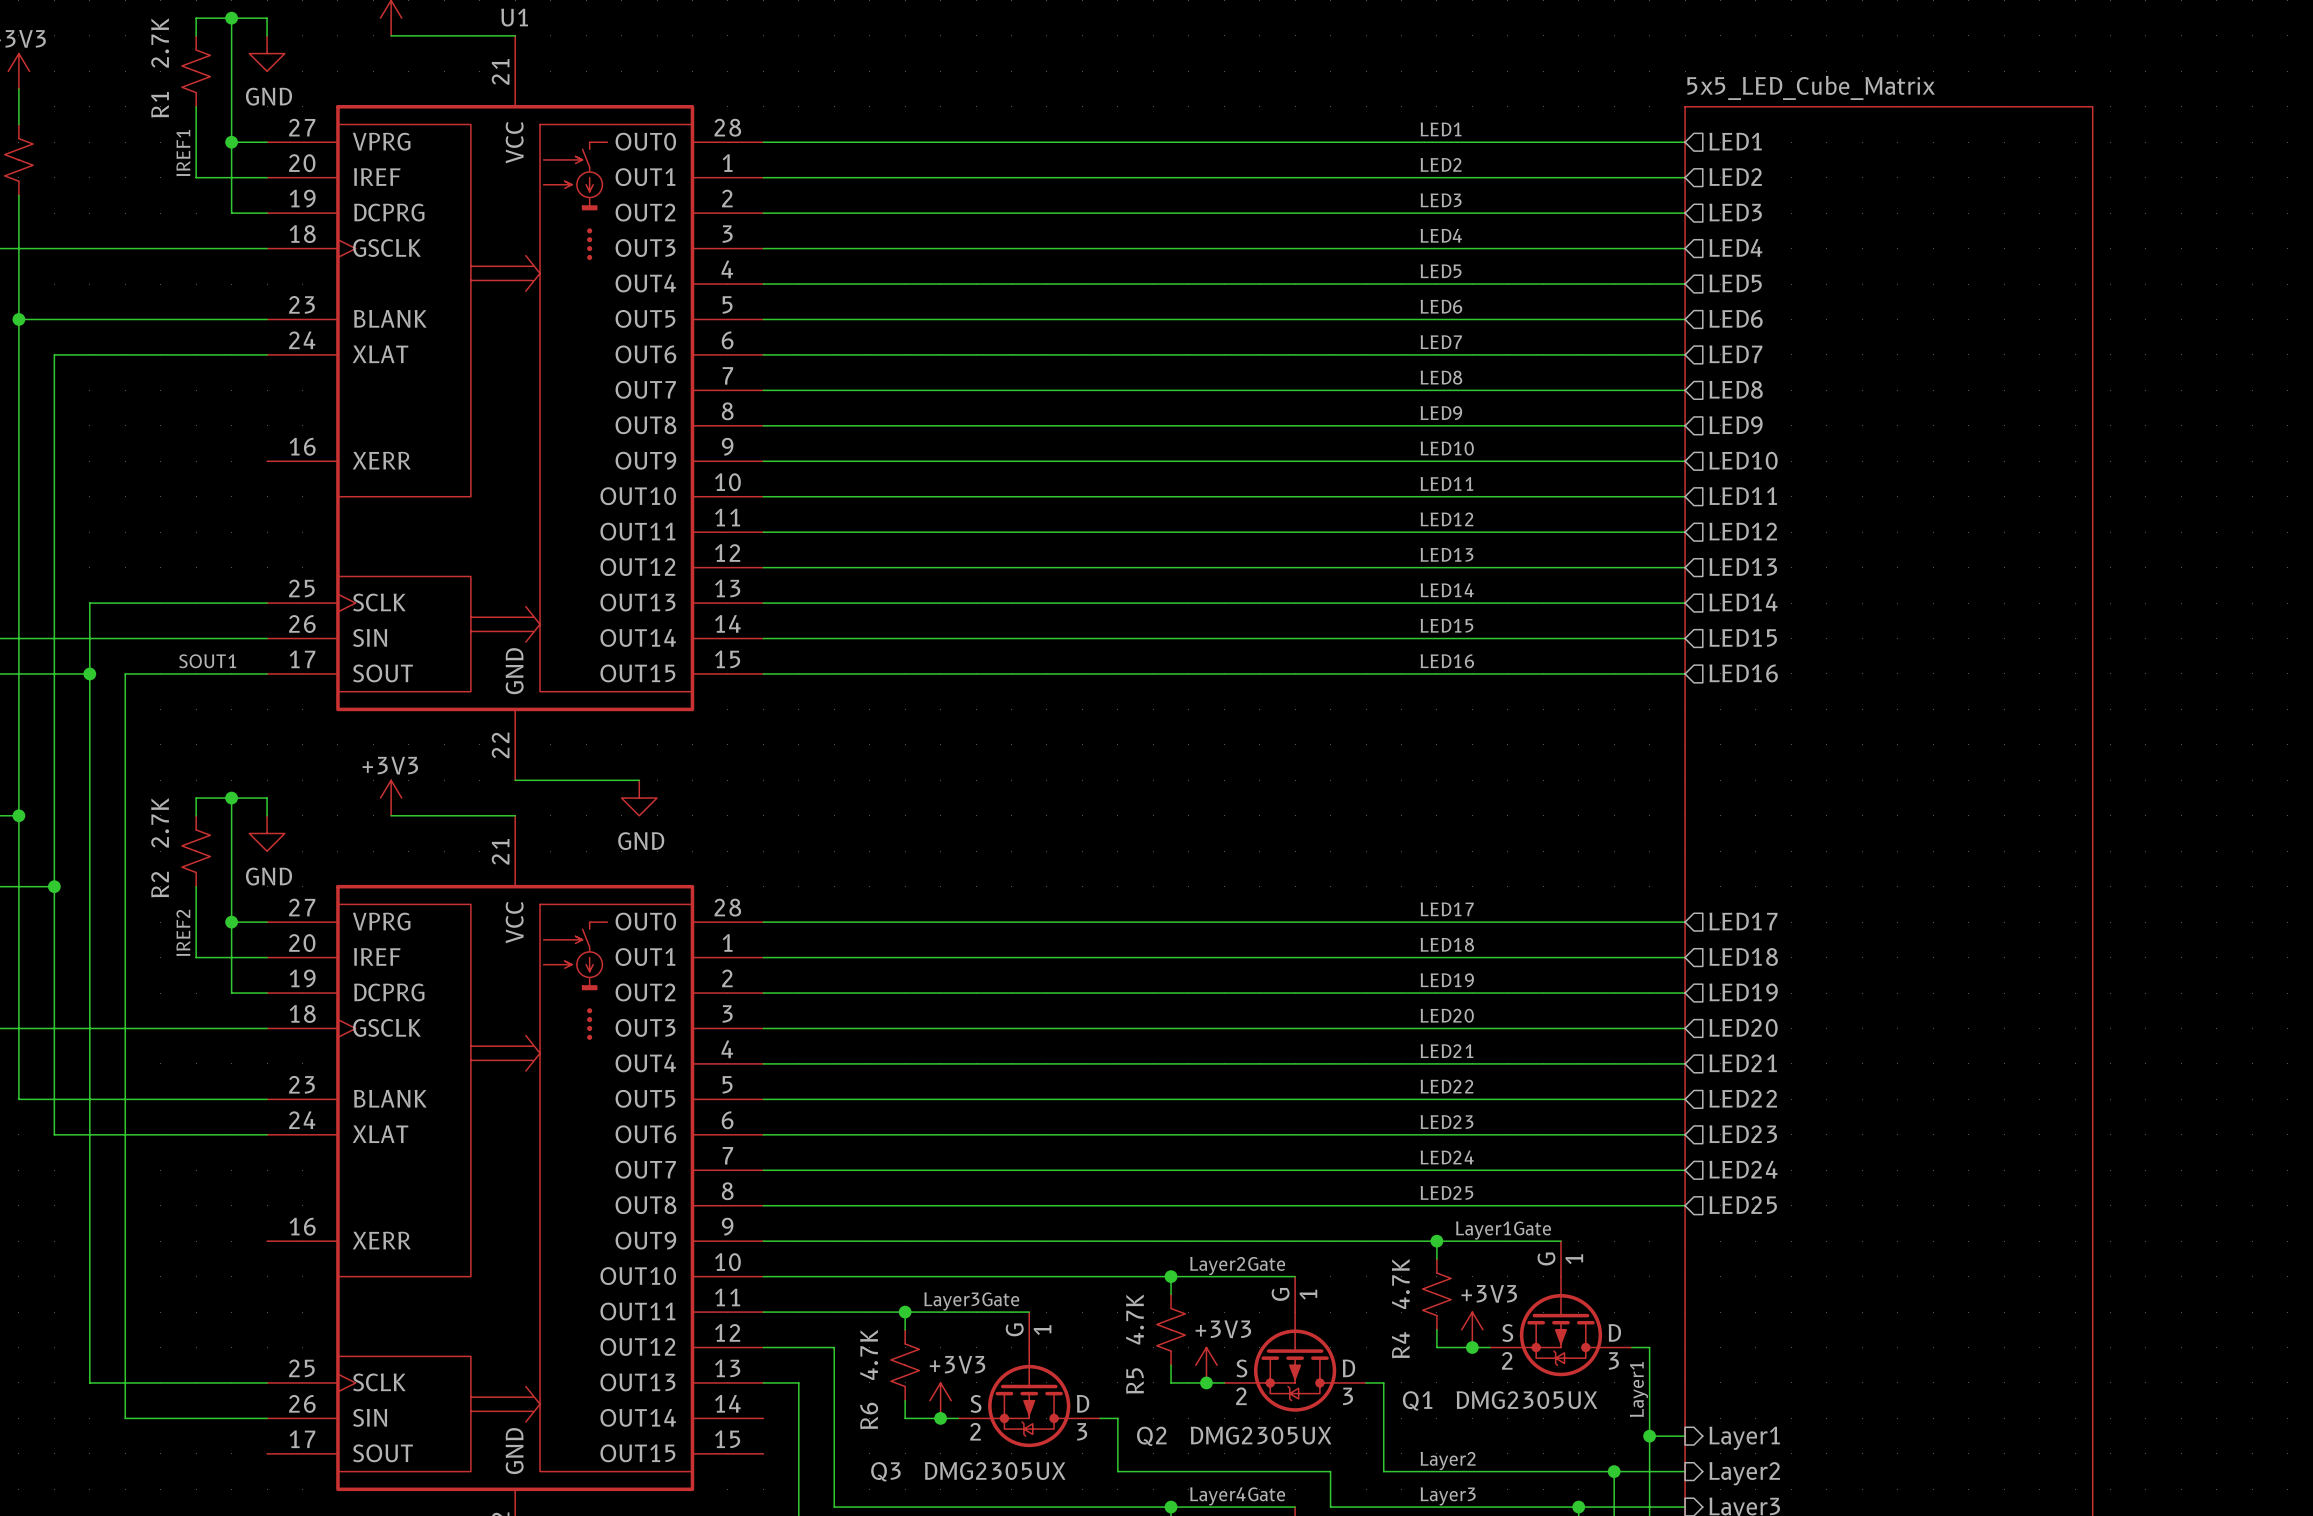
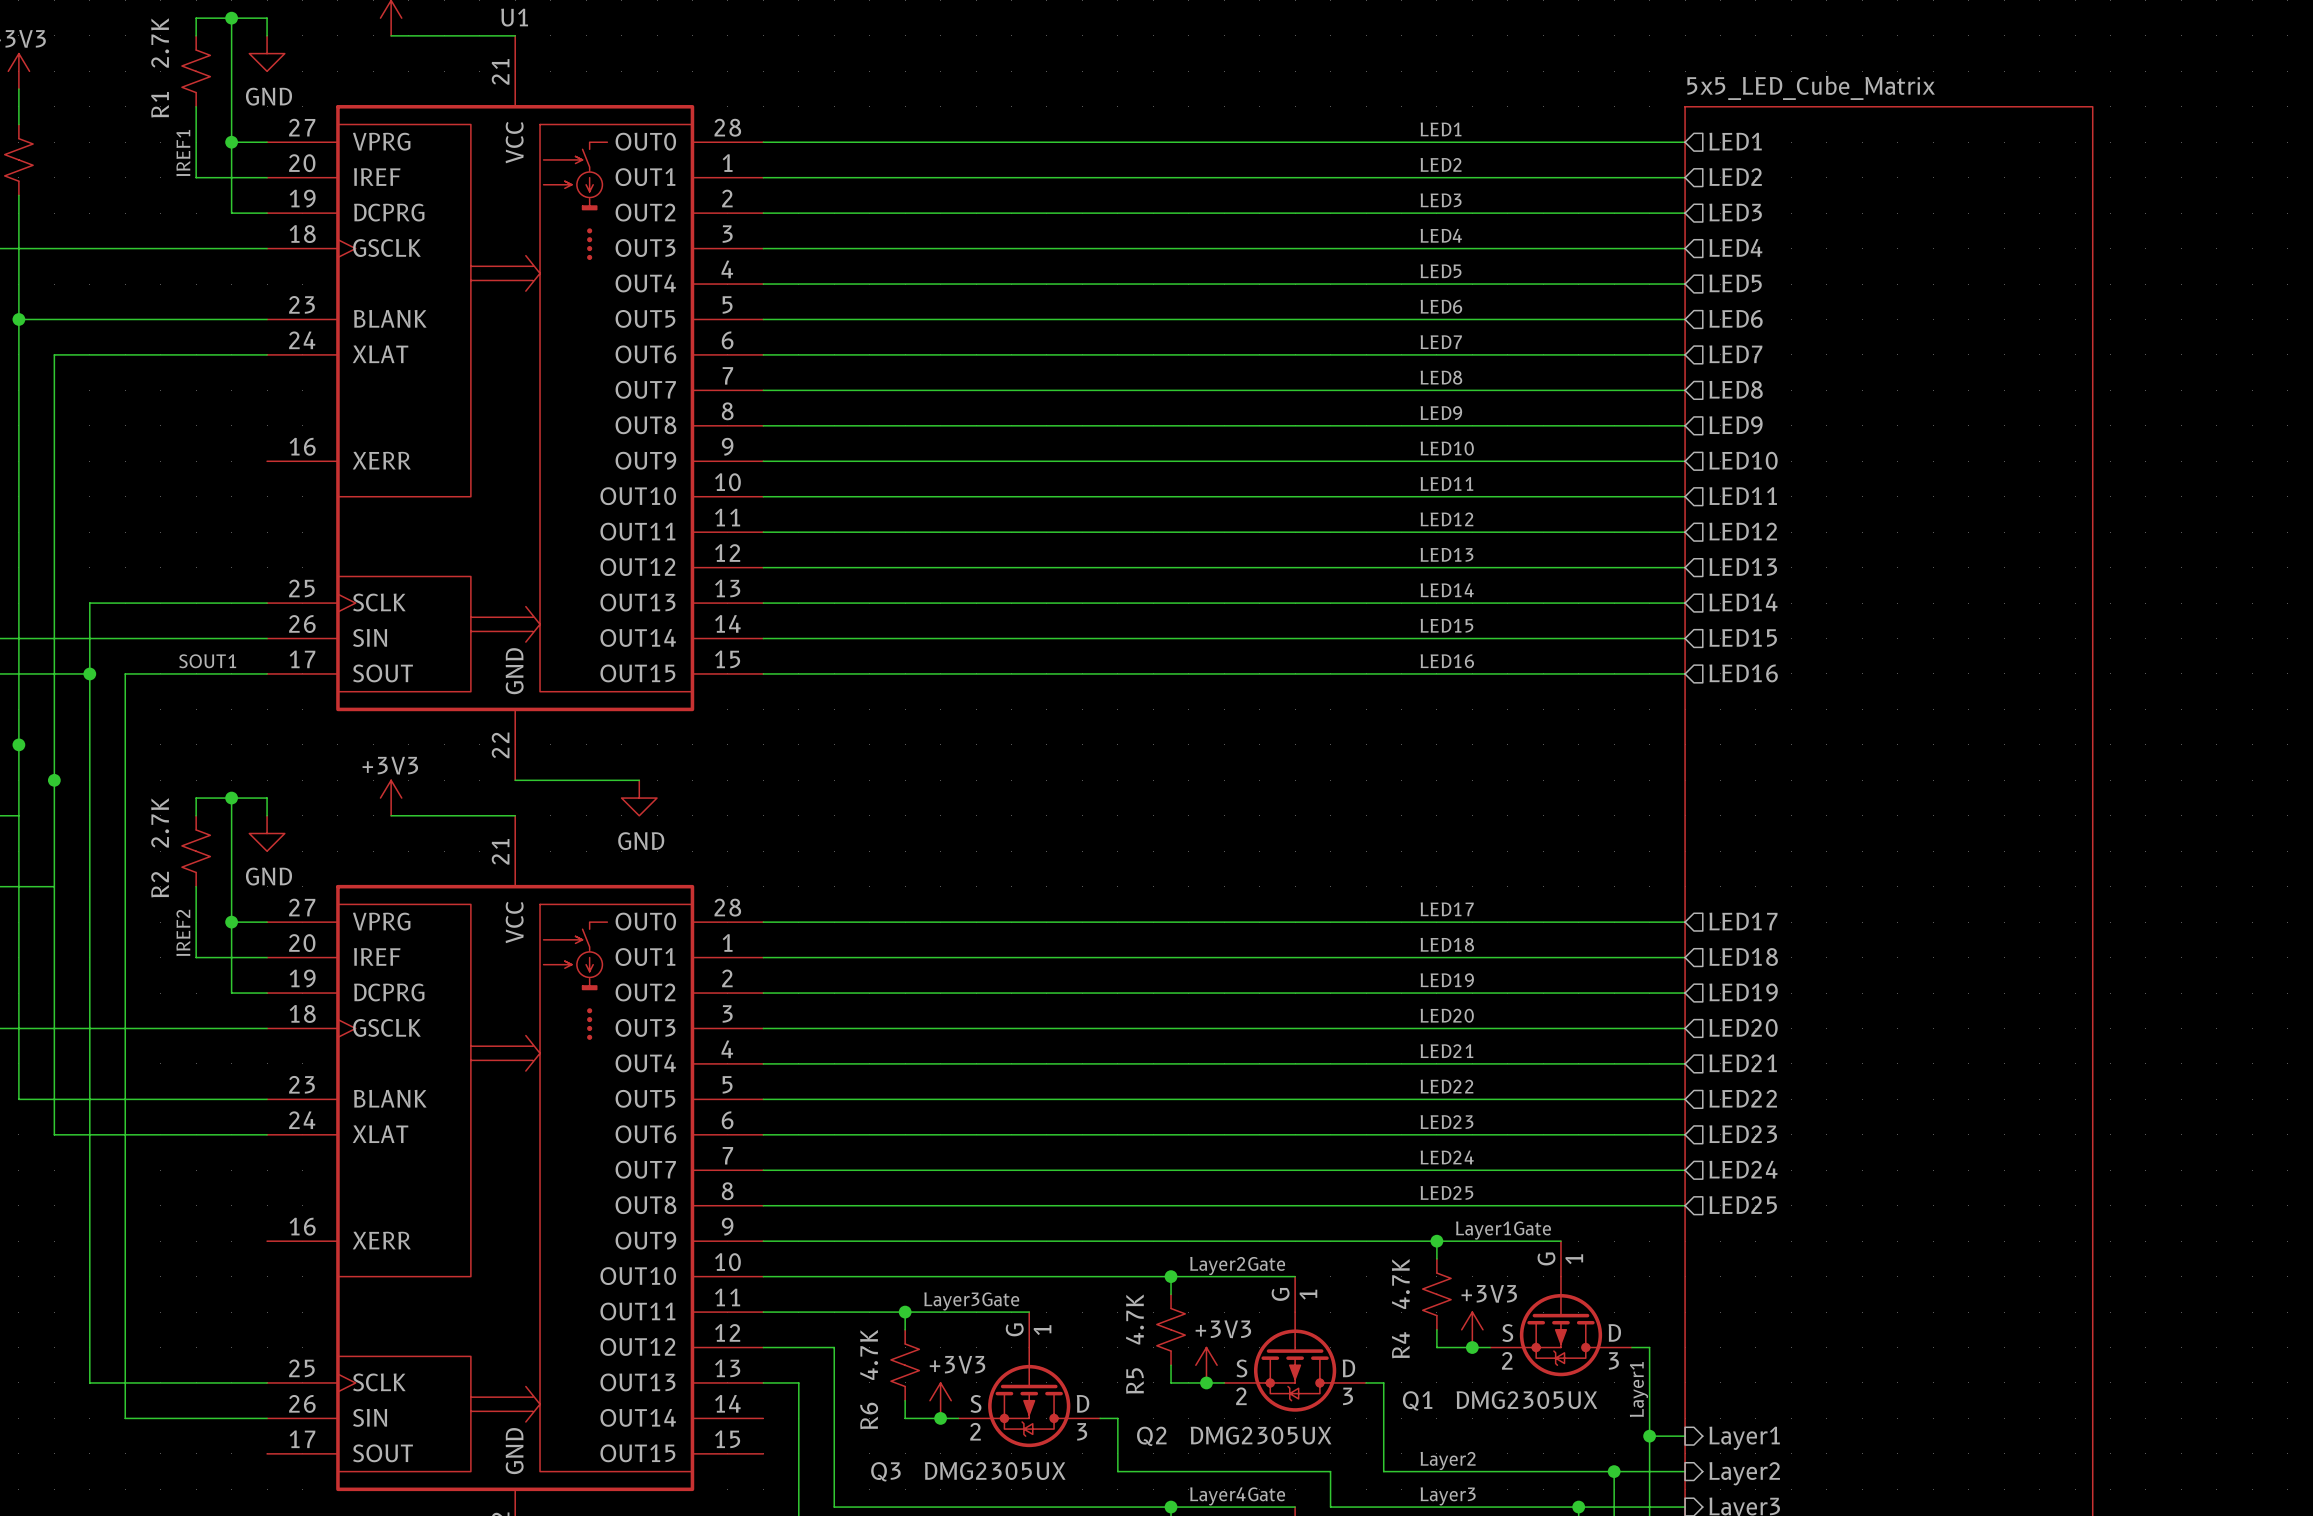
junction: none -> (18, 744)
junction: none -> (54, 780)
junction: (18, 815) -> none
junction: (54, 886) -> none

